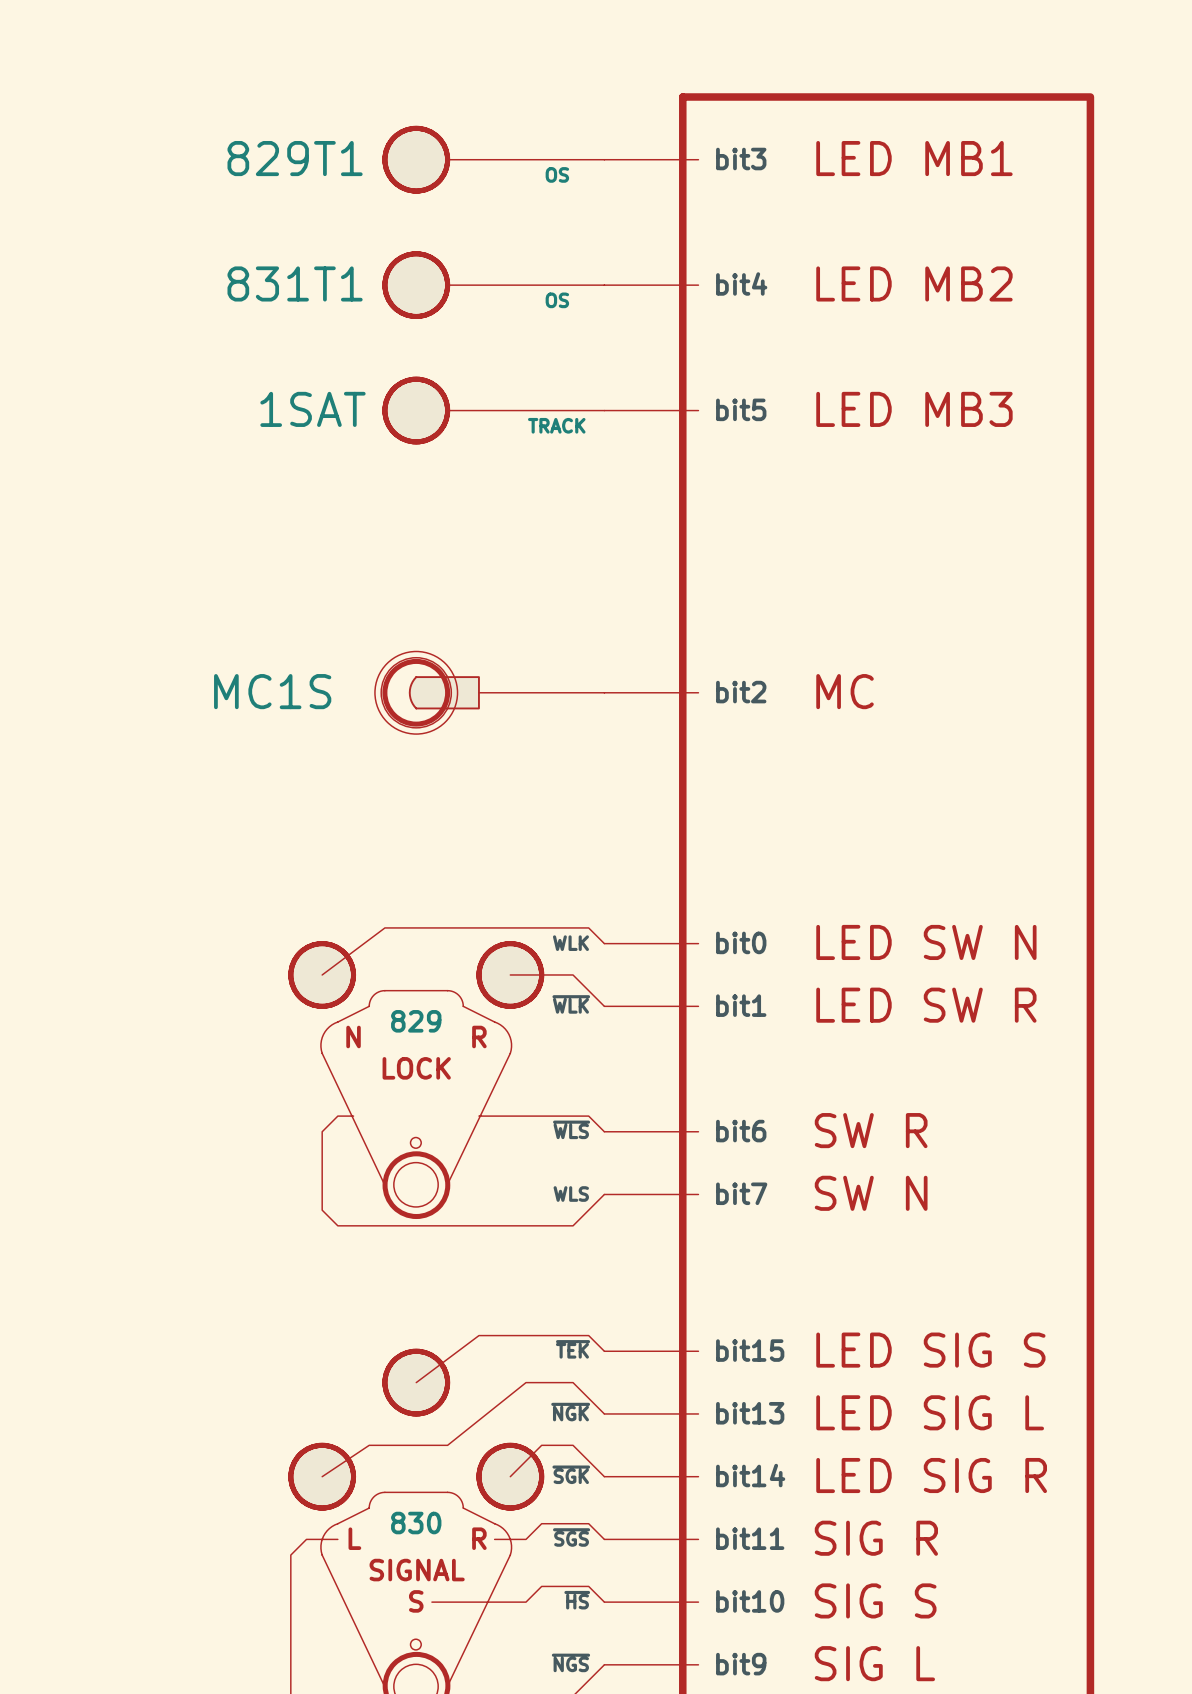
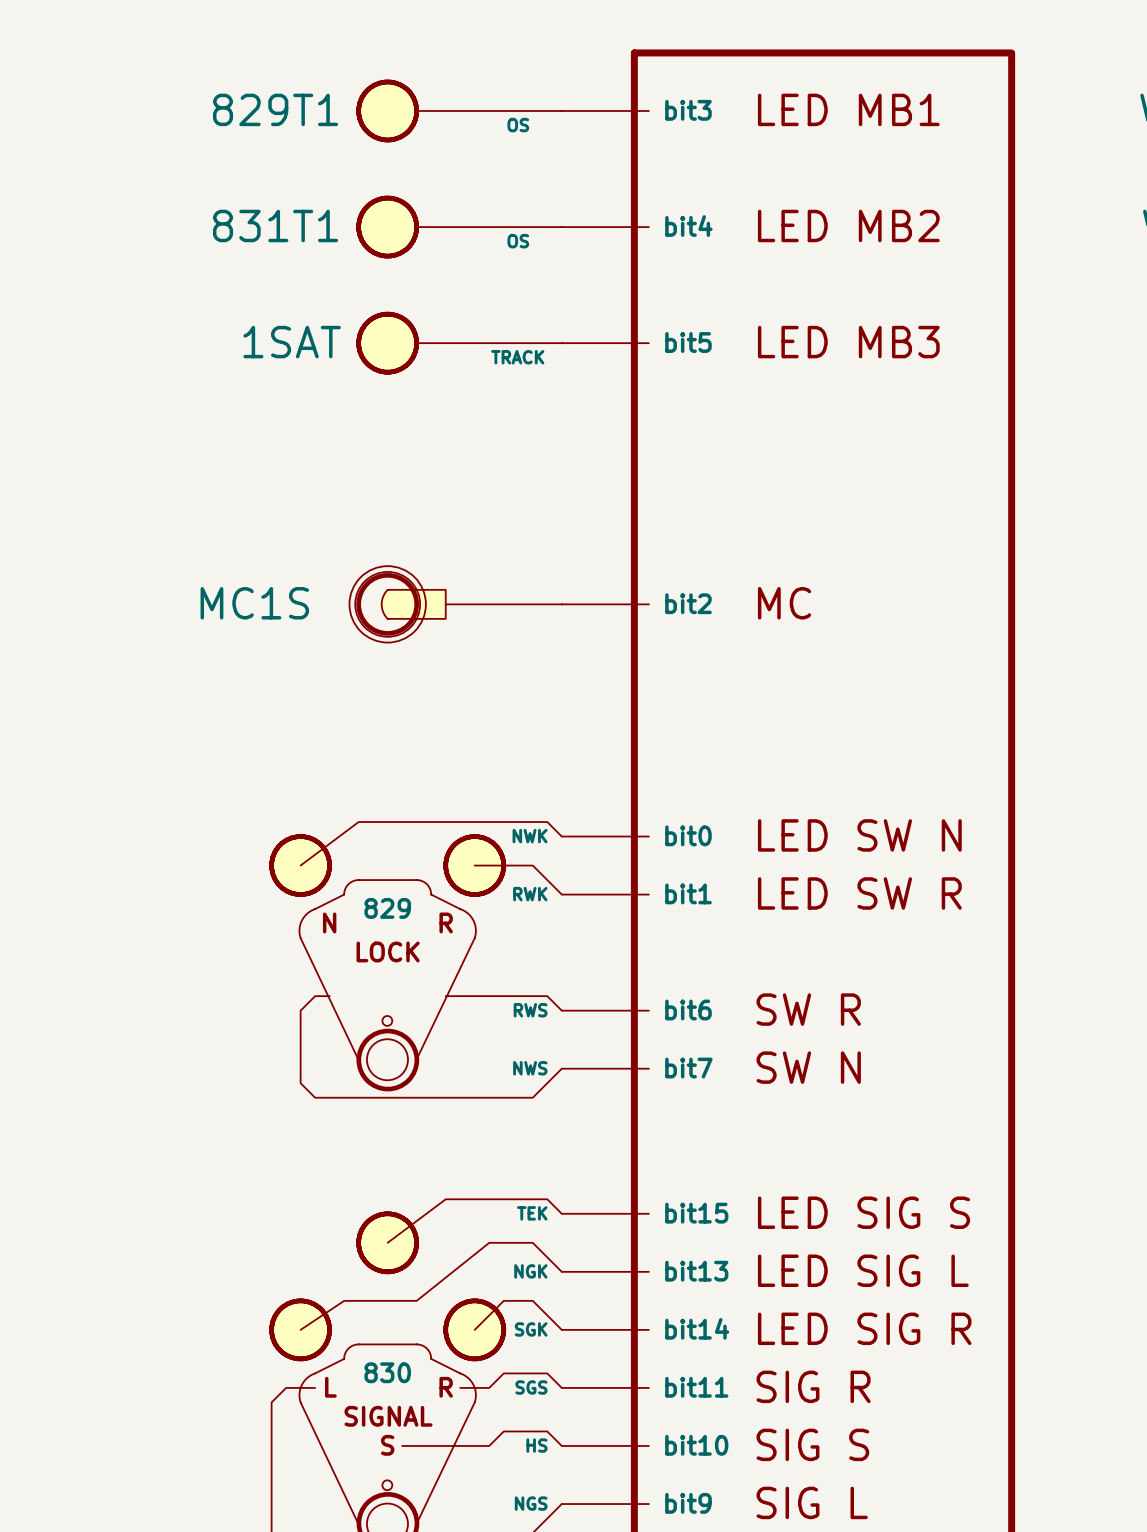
part pin name: WLK (570, 943) -> NWK (530, 836)
part pin name: ~{WLK} (571, 1004) -> RWK (530, 894)
part pin name: ~{WLS} (571, 1129) -> RWS (530, 1010)
part pin name: WLS (571, 1194) -> NWS (530, 1068)
part pin name: ~{TEK} (573, 1349) -> TEK (532, 1213)
part pin name: ~{NGK} (570, 1412) -> NGK (530, 1271)
part pin name: ~{SGK} (571, 1474) -> SGK (531, 1329)
part pin name: ~{SGS} (571, 1537) -> SGS (531, 1387)
part pin name: ~{HS} (577, 1600) -> HS (536, 1445)
part pin name: ~{NGS} (570, 1662) -> NGS (531, 1503)

